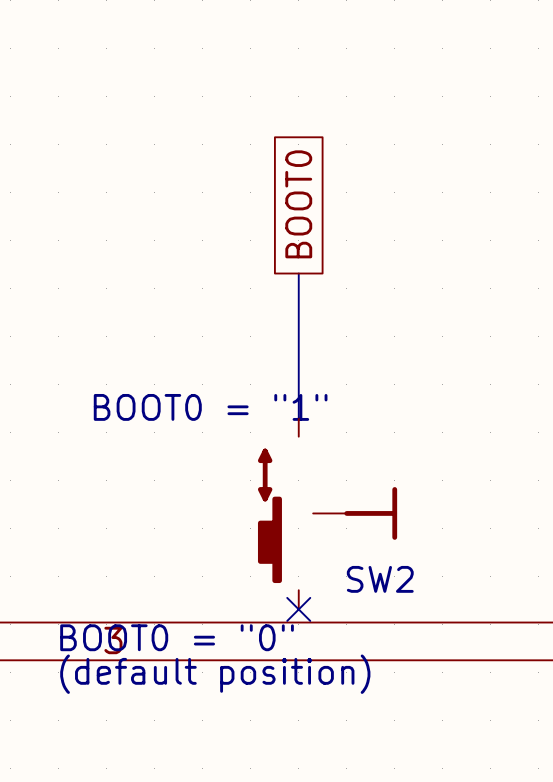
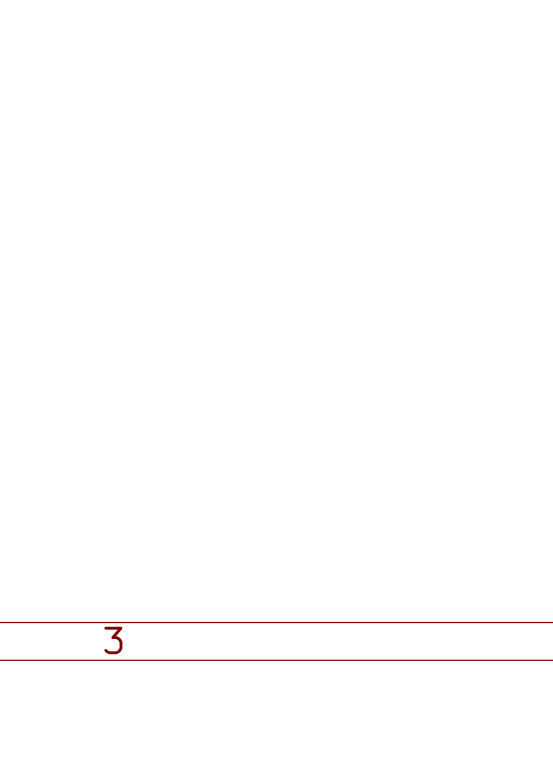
global label: BOOT0 (298, 204) -> none
wire: (298, 273) (298, 417) -> none
text: BOOT0 = "1" (210, 407) -> none
SW2: (302, 513) -> none
power symbol: (370, 513) -> none
no-connect mark: (298, 609) -> none
text: BOOT0 = "0" (177, 637) -> none
text: (default position) (215, 674) -> none

